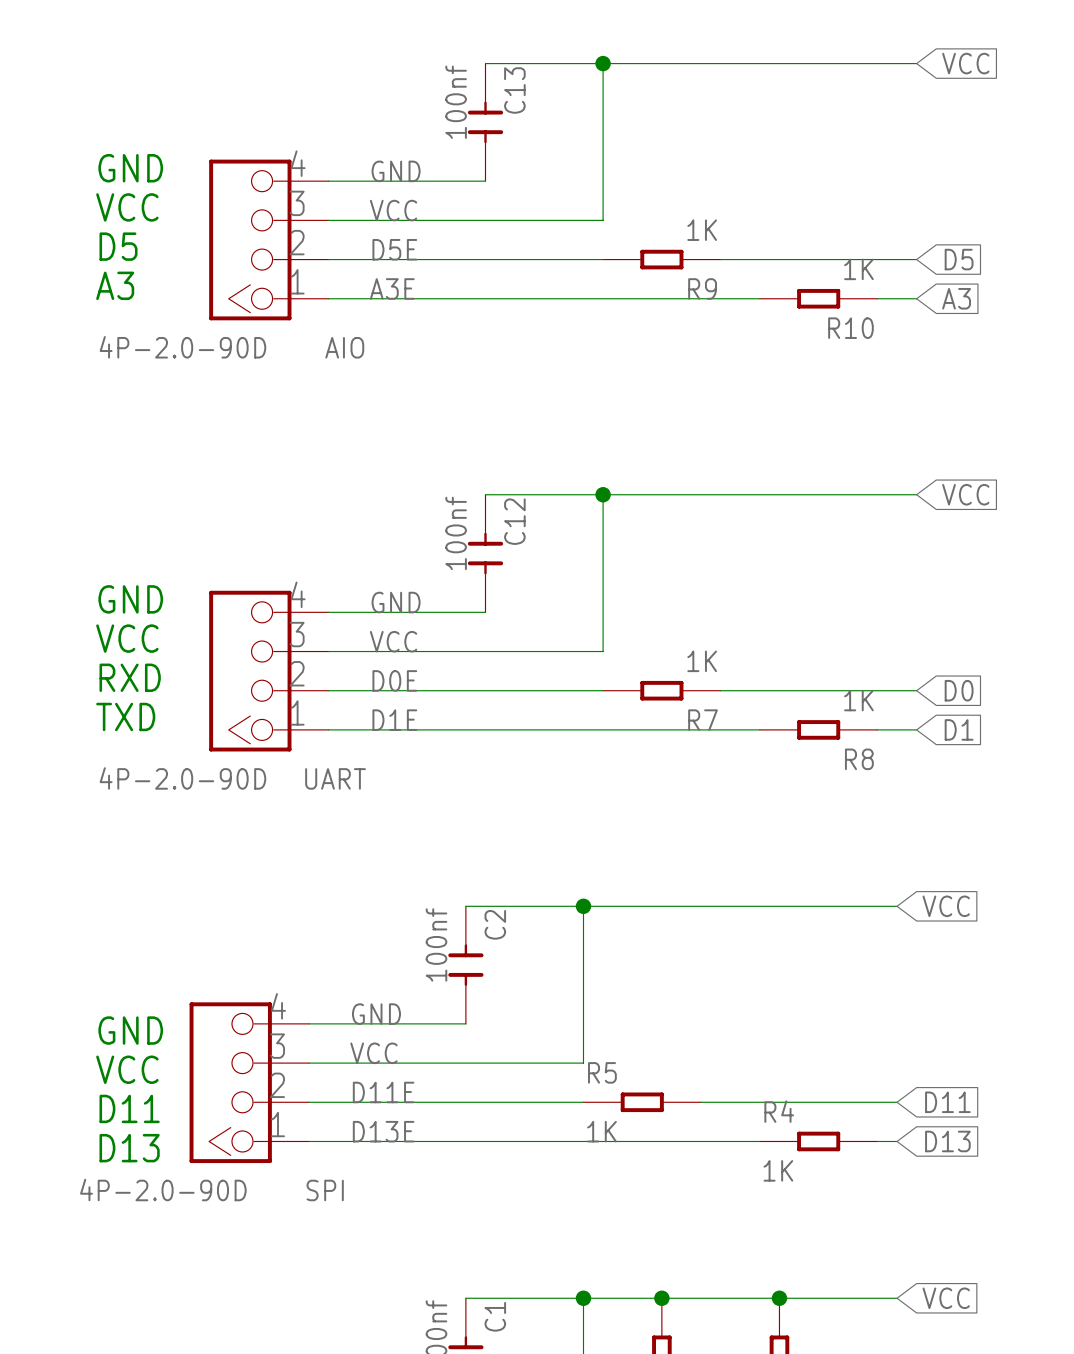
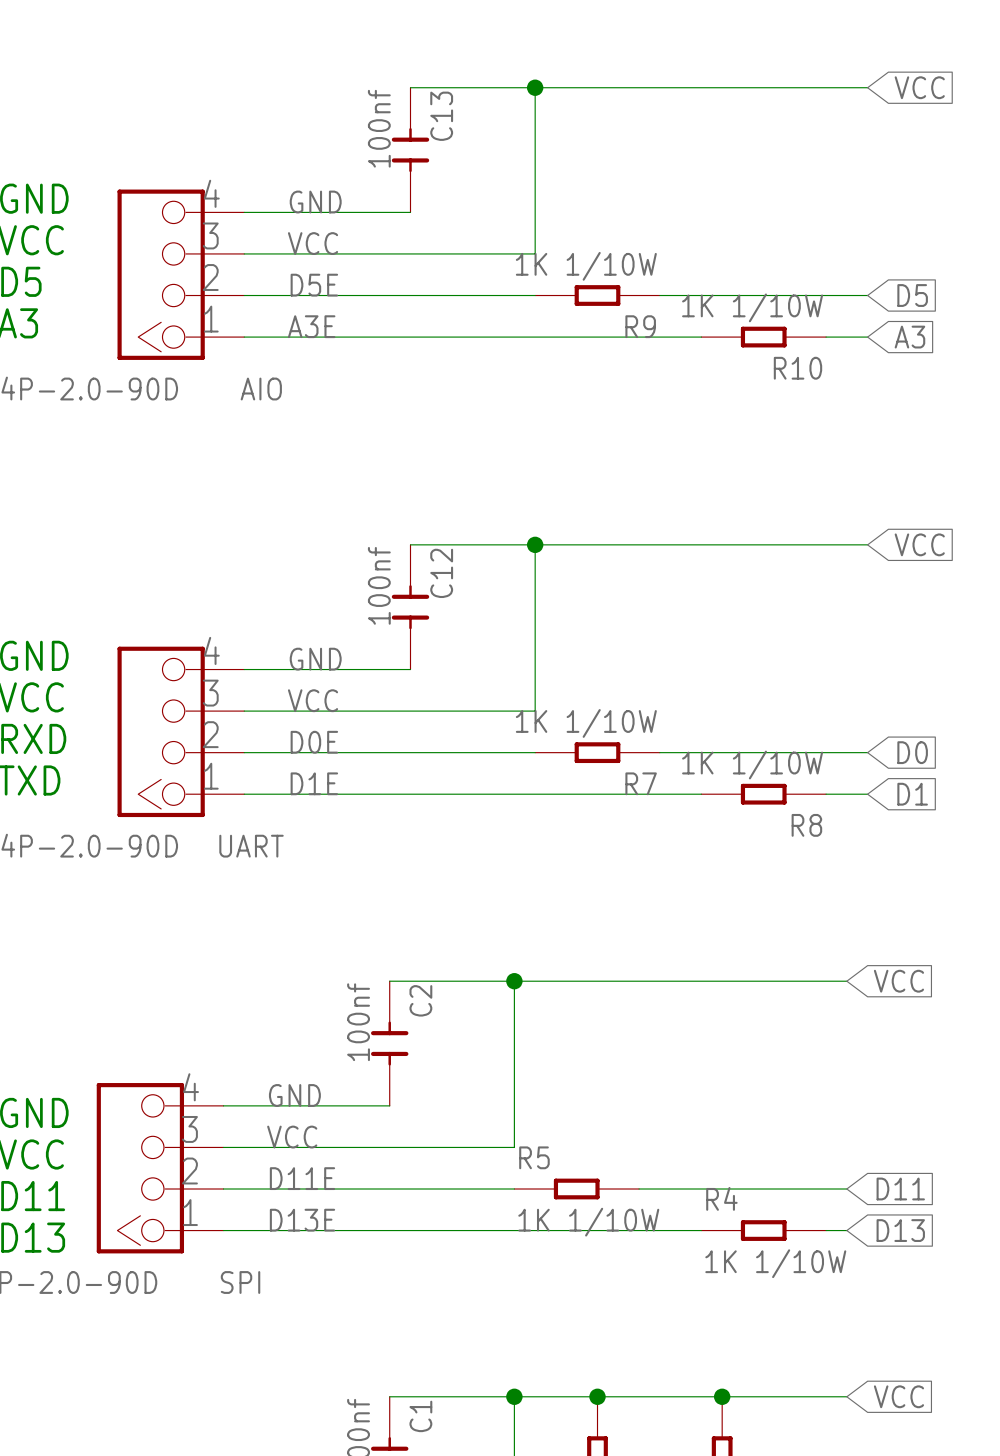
R9 value: 1K (702, 230) -> 1K 1/10W (586, 266)
R10 value: 1K (858, 269) -> 1K 1/10W (752, 307)
R7 value: 1K (702, 661) -> 1K 1/10W (586, 723)
R8 value: 1K (858, 700) -> 1K 1/10W (752, 765)
R5 value: 1K (601, 1131) -> 1K 1/10W (588, 1222)
R4 value: 1K (778, 1170) -> 1K 1/10W (775, 1263)

